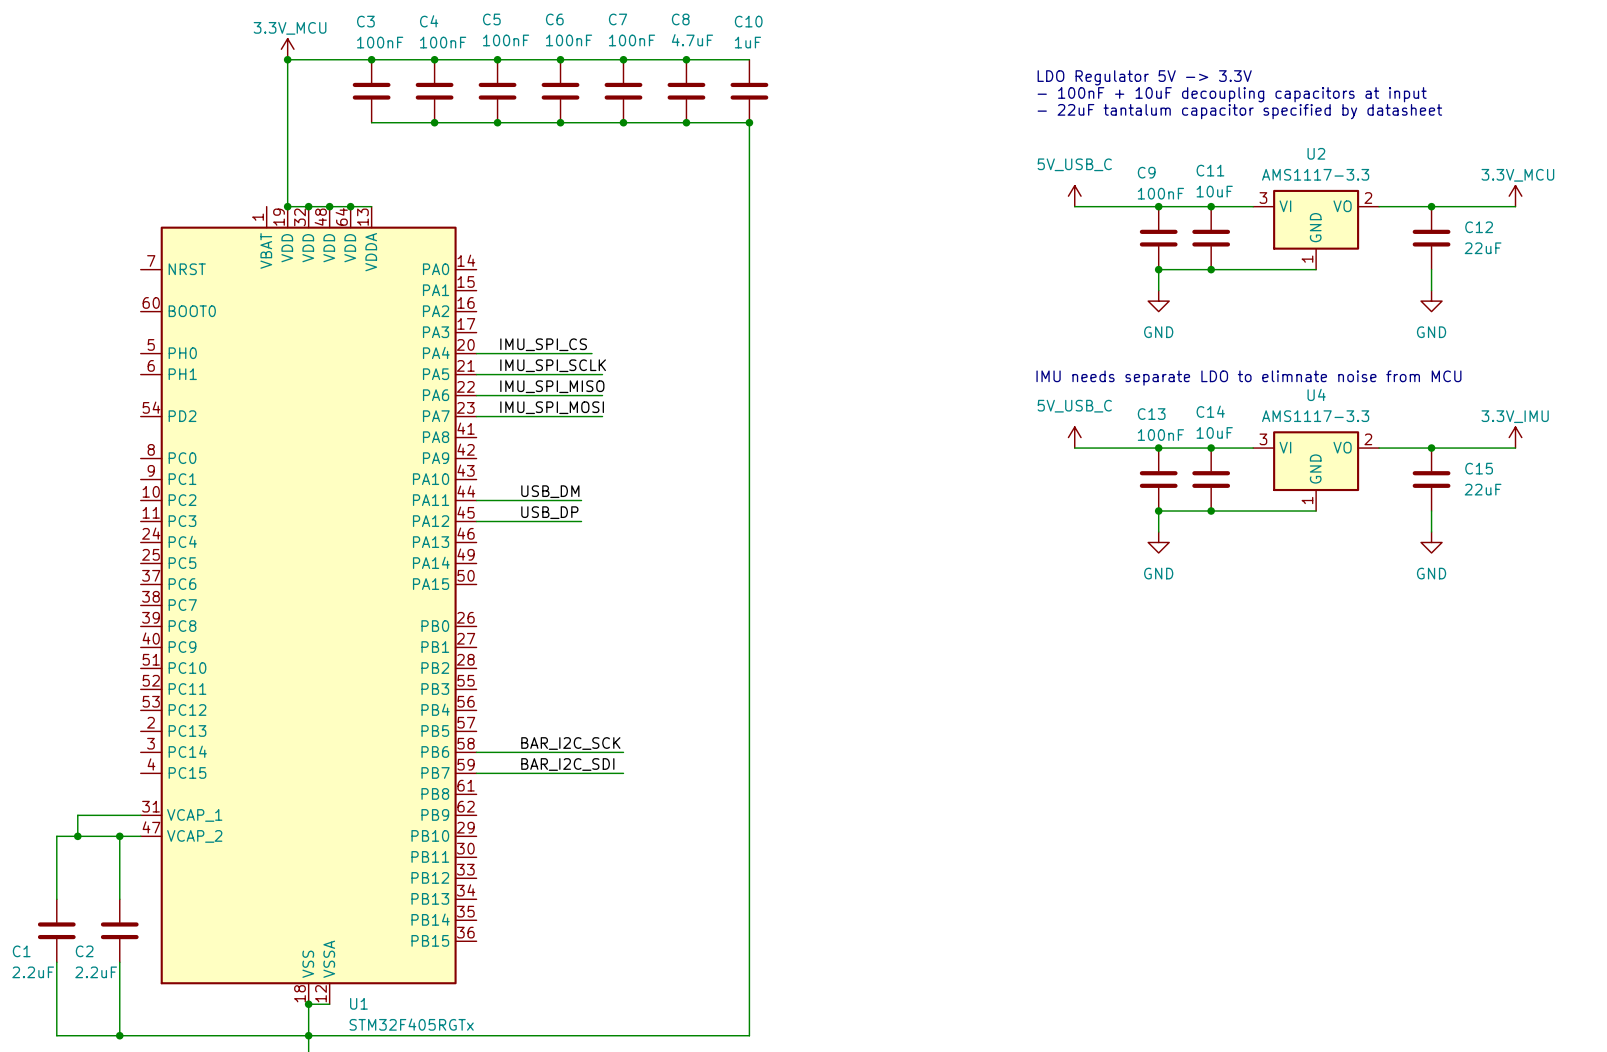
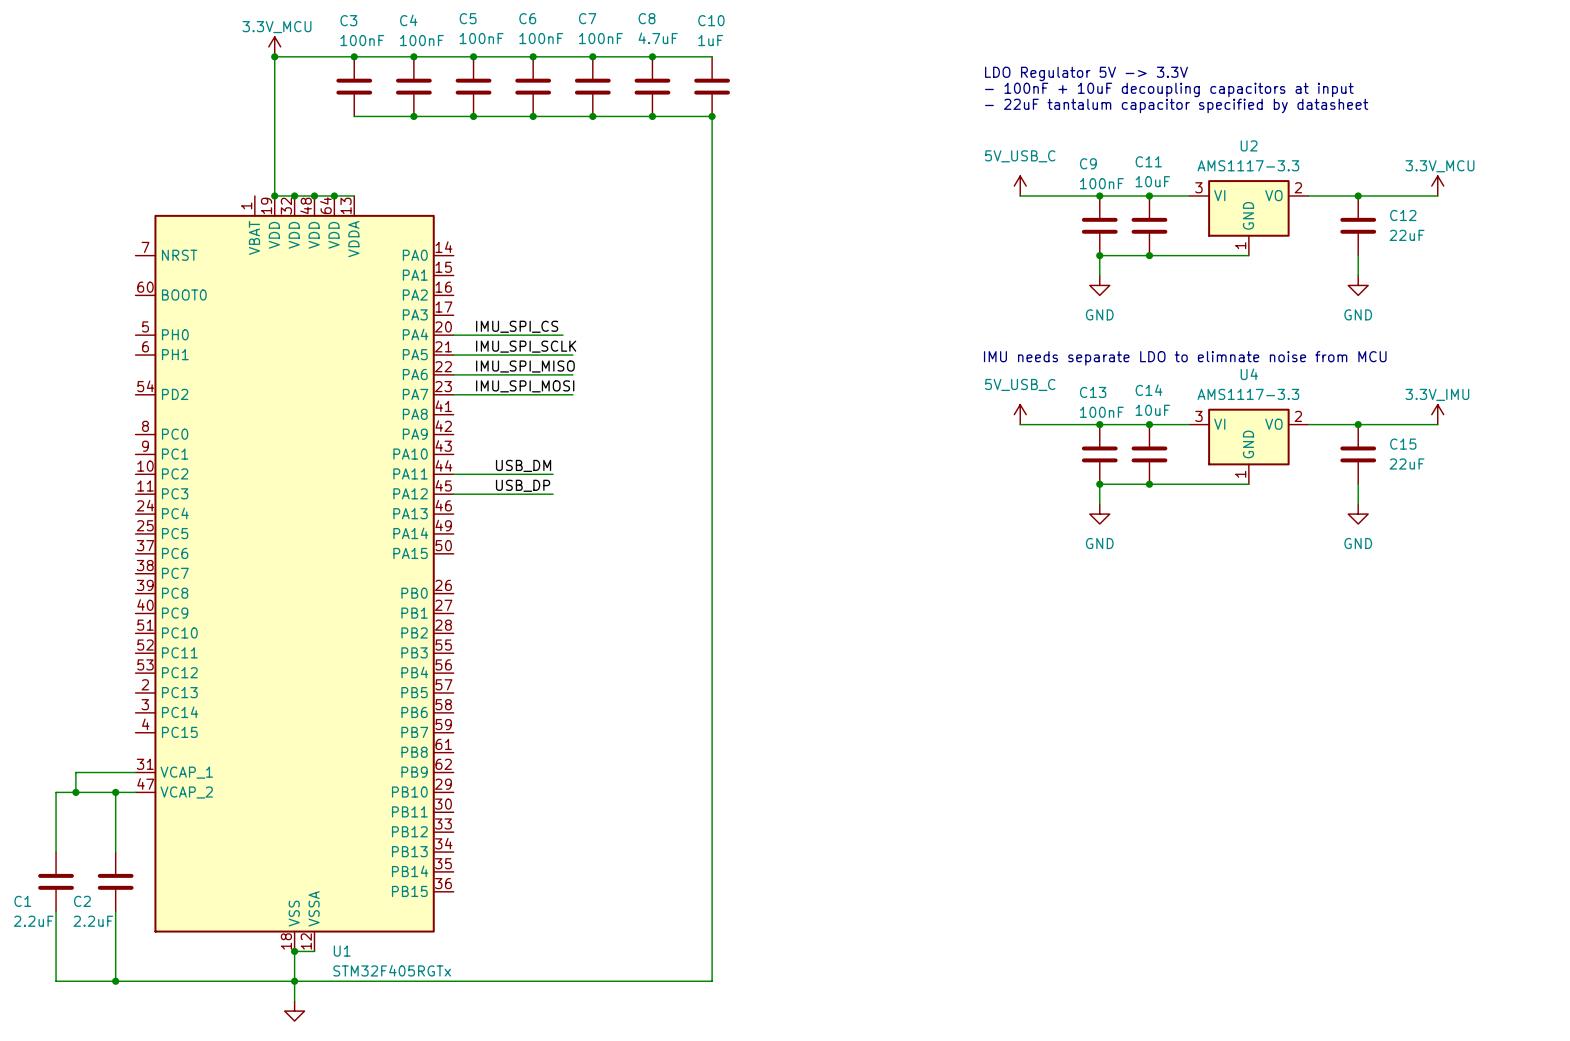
label: BAR_I2C_SCK (570, 743) -> none
wire: (476, 752) (623, 752) -> none
label: BAR_I2C_SDI (567, 764) -> none
wire: (476, 773) (623, 773) -> none

